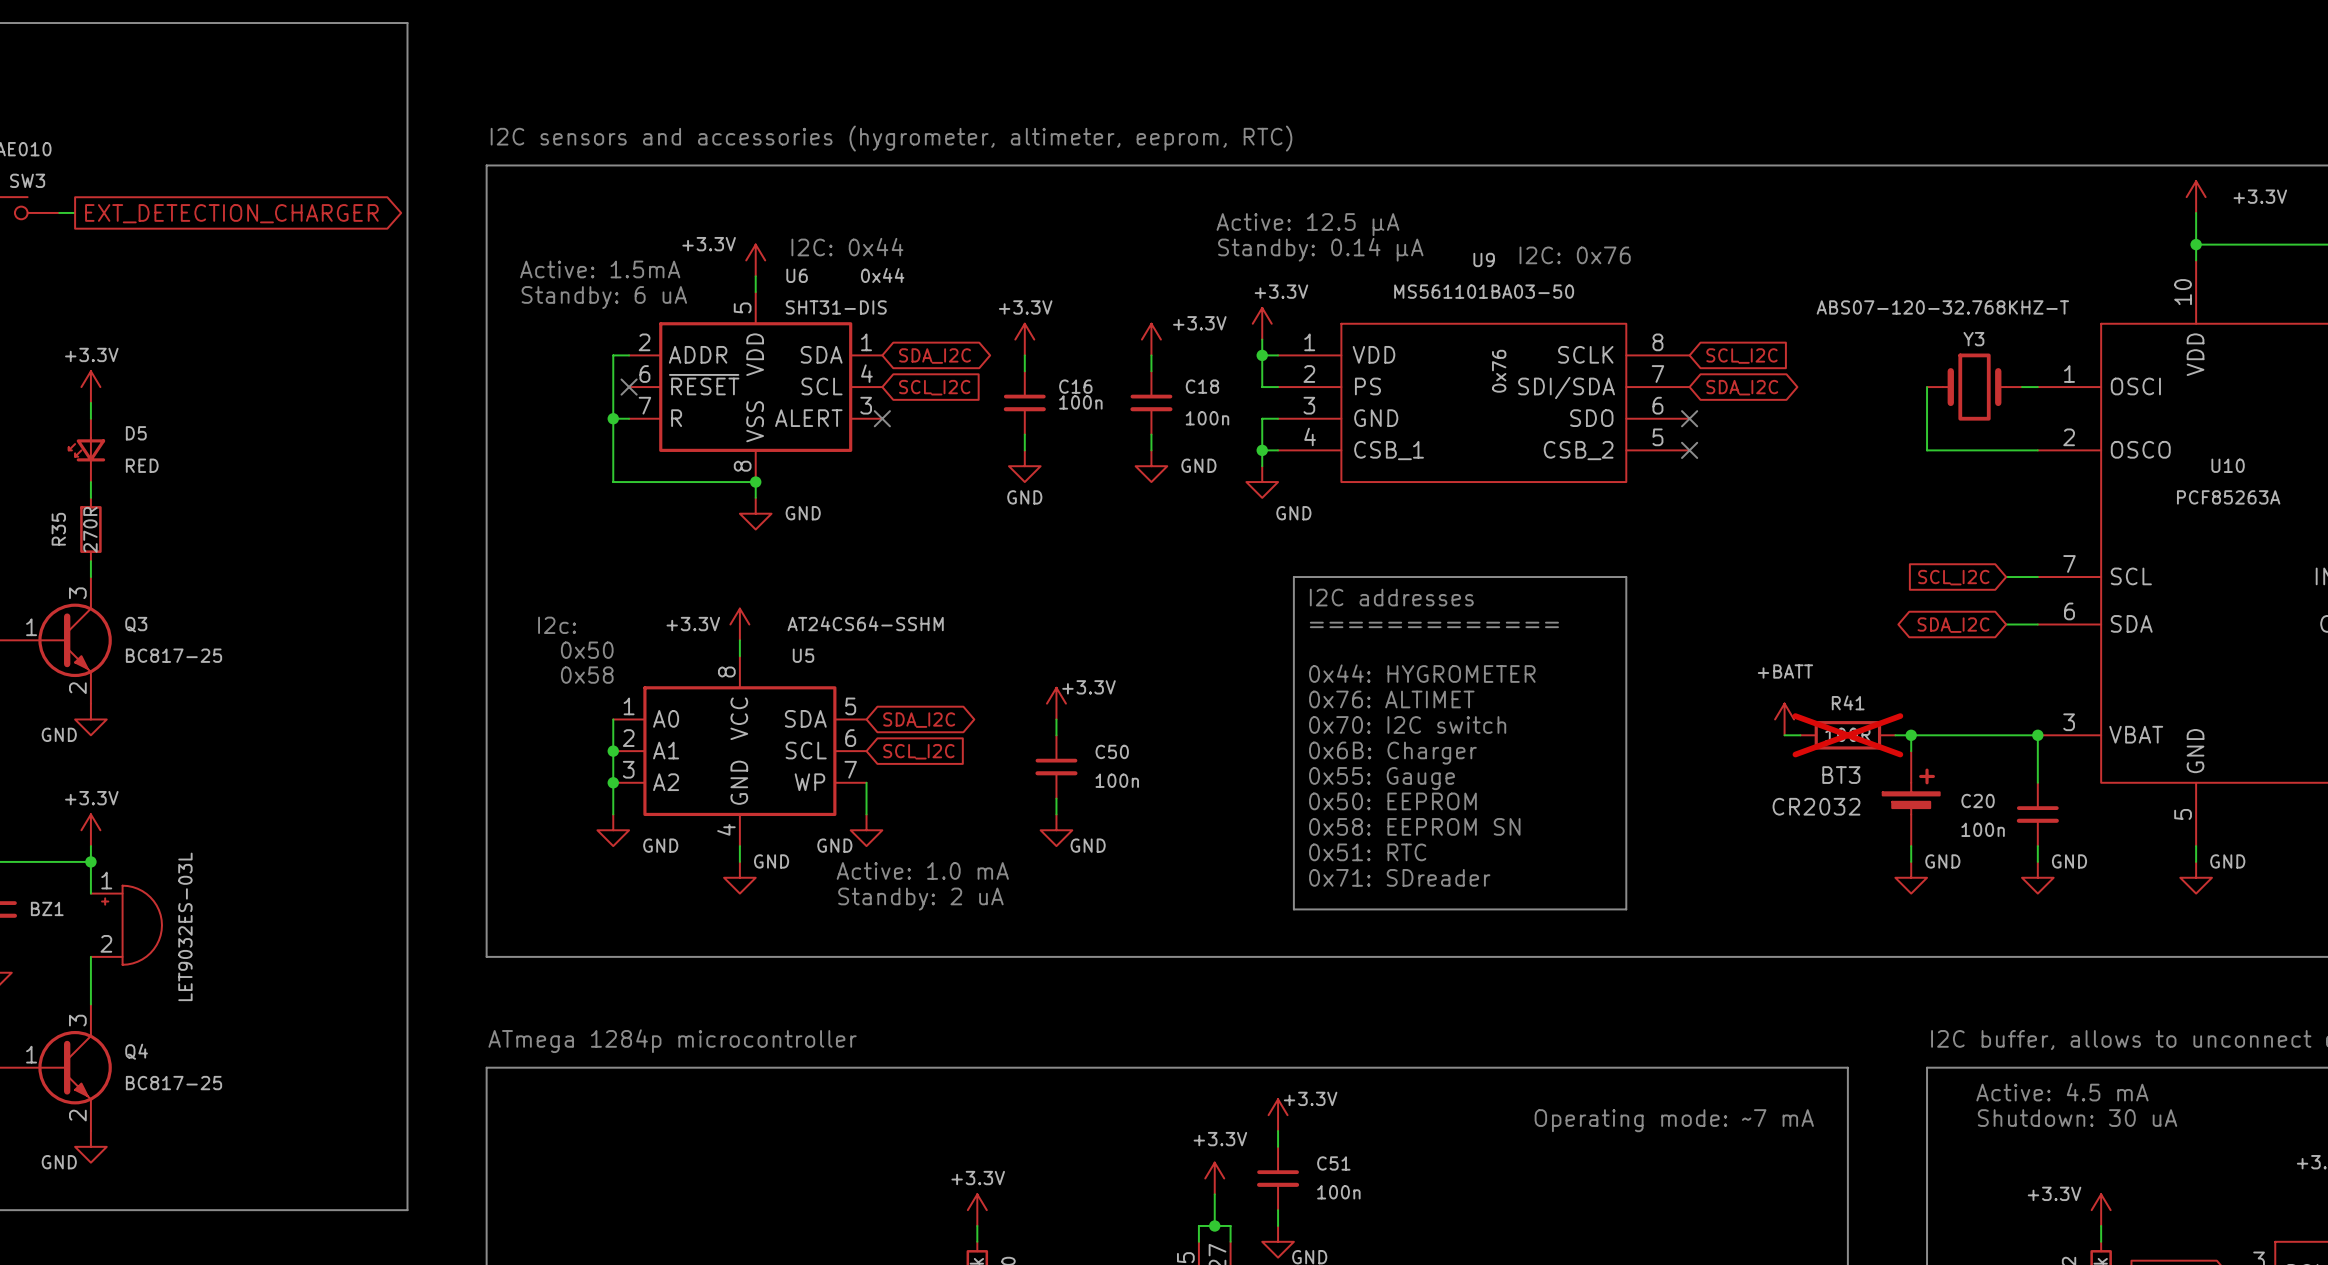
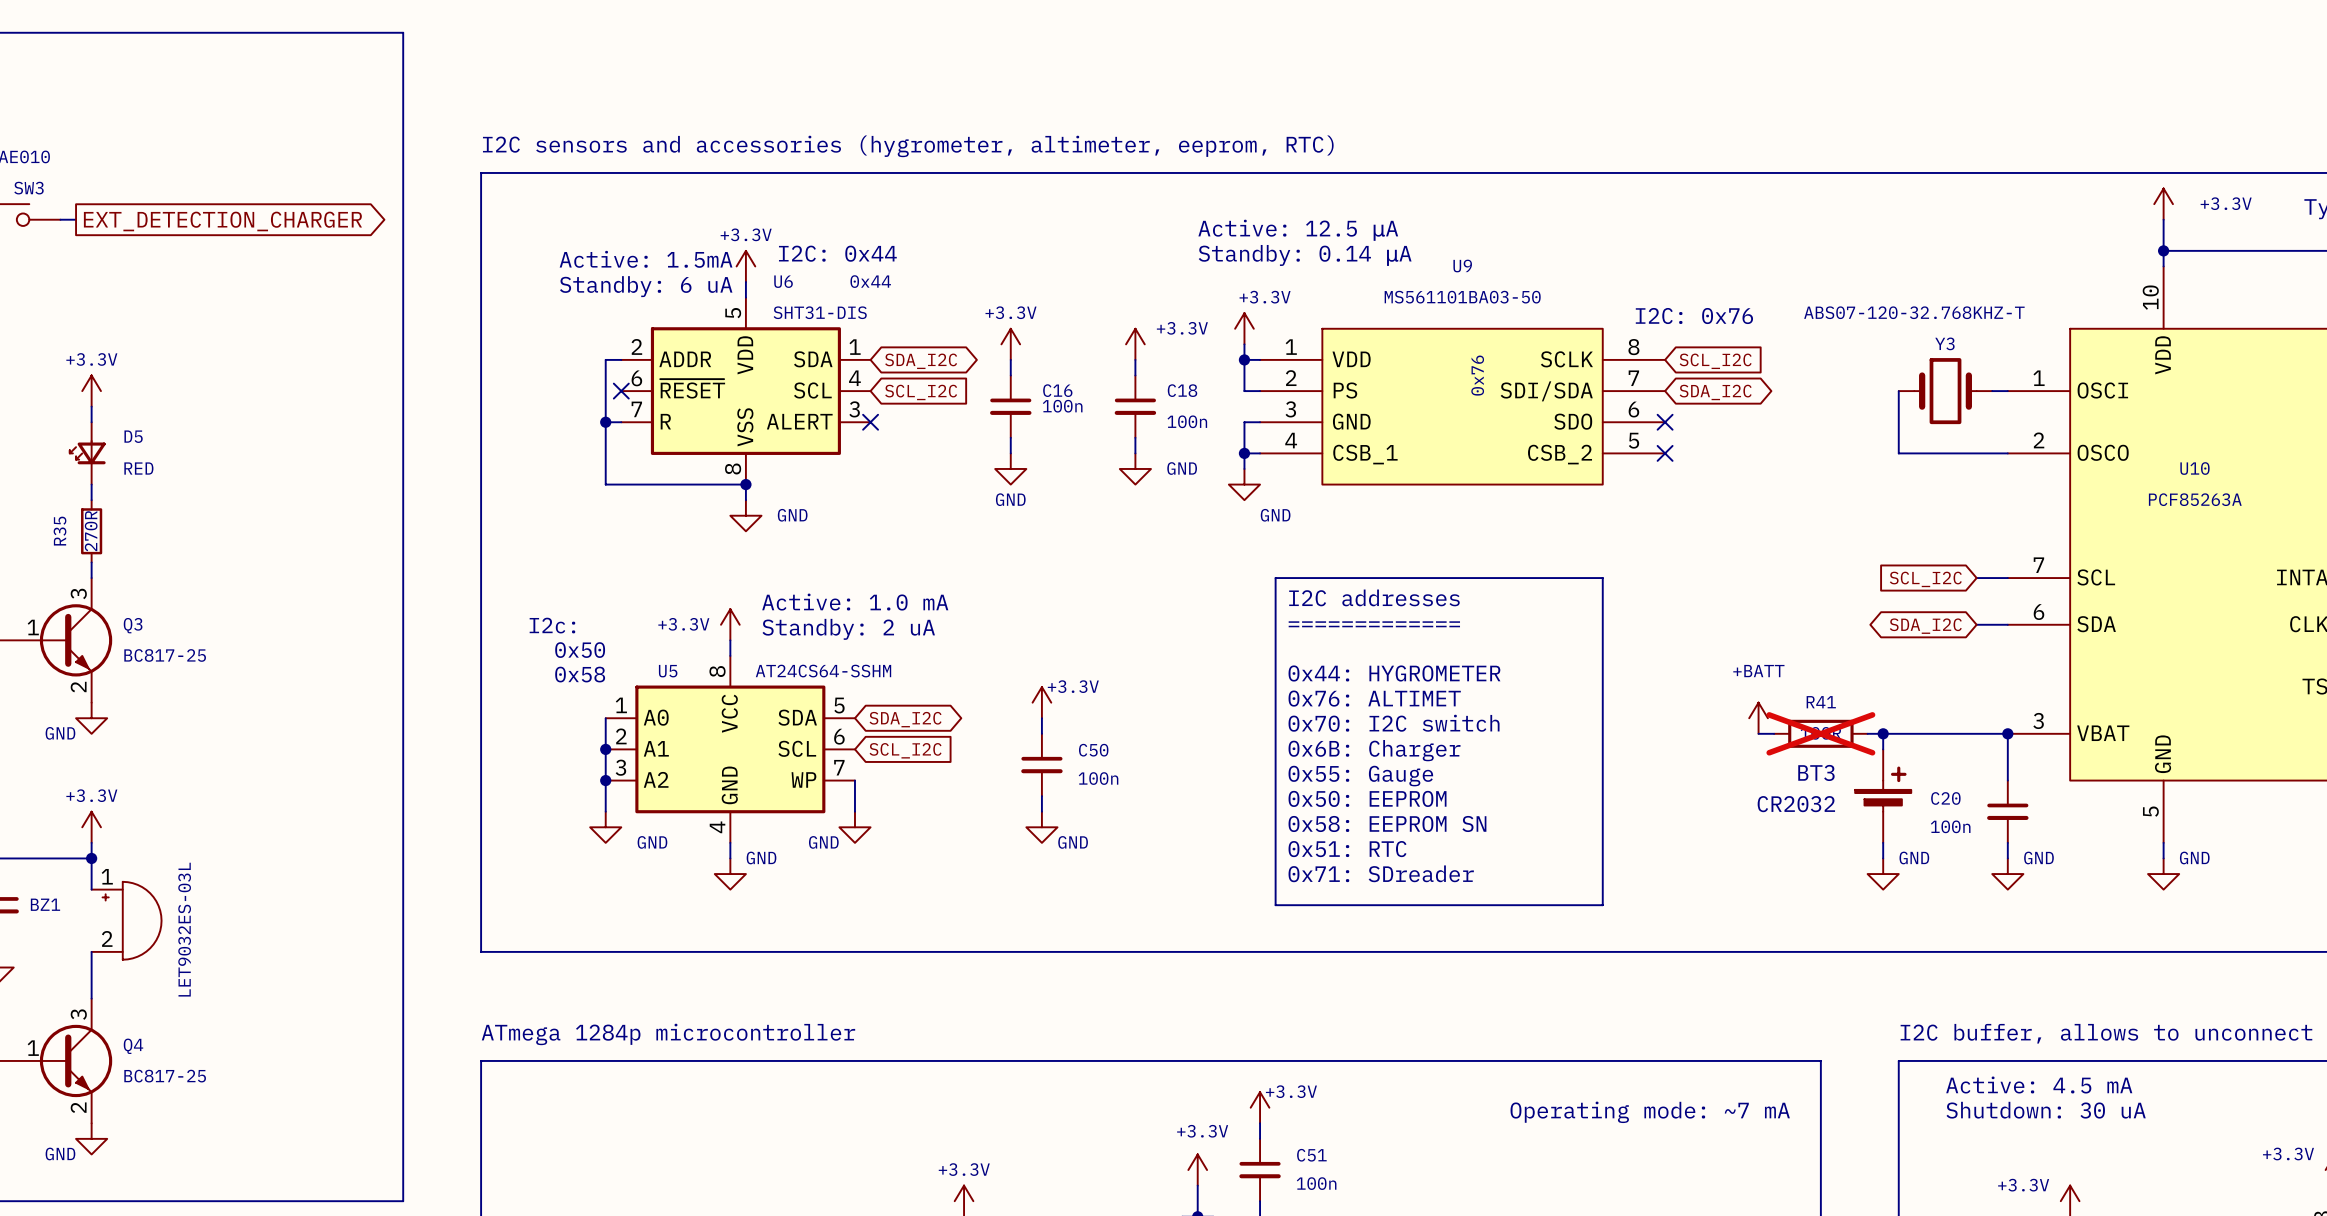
power symbol text position: +3.3V (709, 244) -> +3.3V (746, 234)
text position: I2C: 0x76 (1575, 255) -> I2C: 0x76 (1694, 316)
text position: Active: 1.5mA (600, 269) -> Active: 1.5mA (646, 259)
text position: Standby: 6 uA (604, 297) -> Standby: 6 uA (646, 286)
U5 value position: AT24CS64-SSHM (865, 623) -> AT24CS64-SSHM (823, 671)
U5 name position: U5 (803, 655) -> U5 (668, 671)
text position: Active: 1.0 mA (922, 870) -> Active: 1.0 mA (855, 602)
text position: Standby: 2 uA (920, 899) -> Standby: 2 uA (848, 629)

